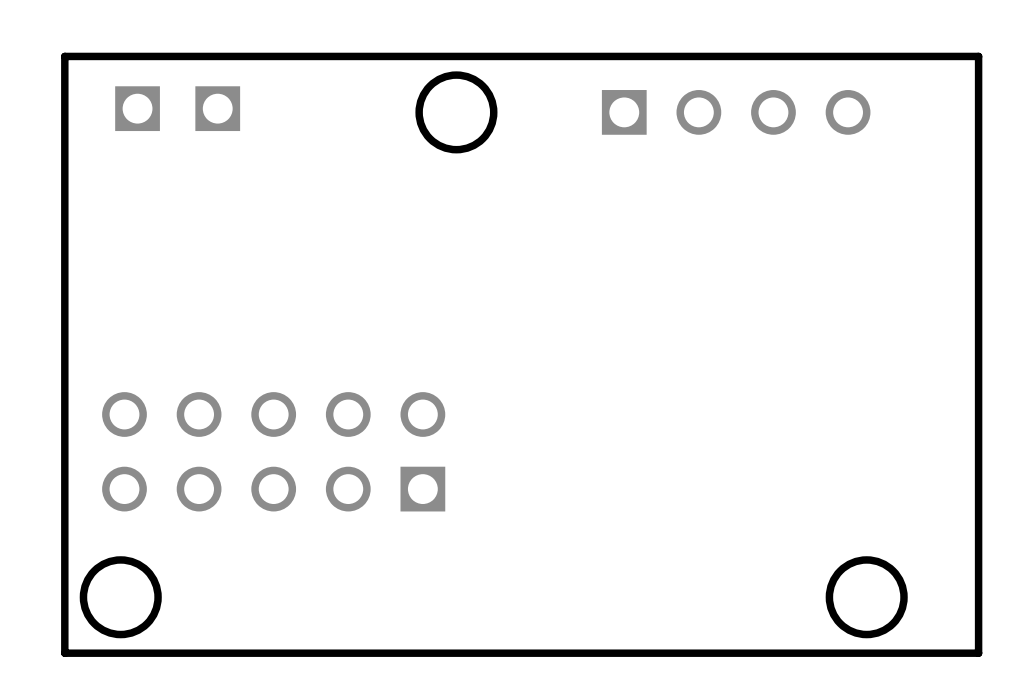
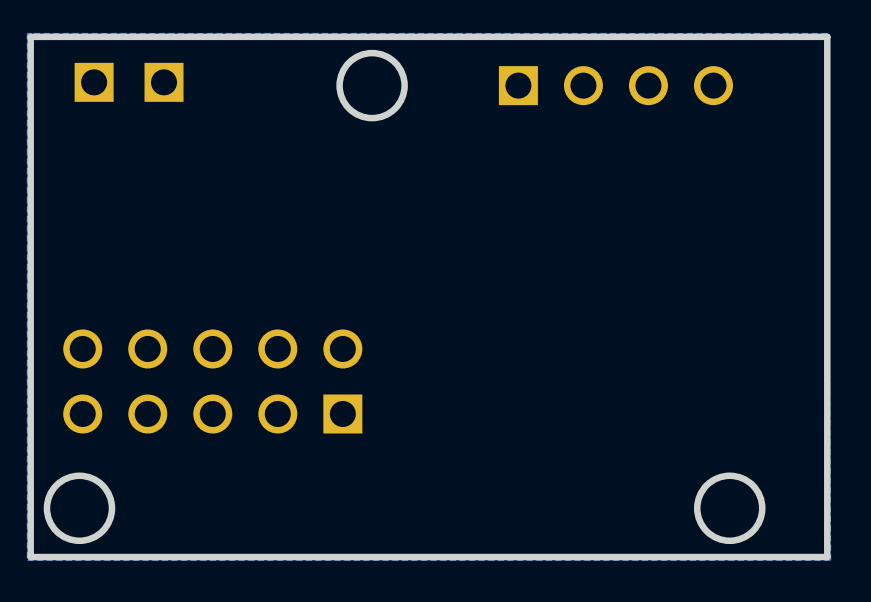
zone outline: none -> (827, 33) (830, 560) (27, 560) (27, 33) (827, 33)

